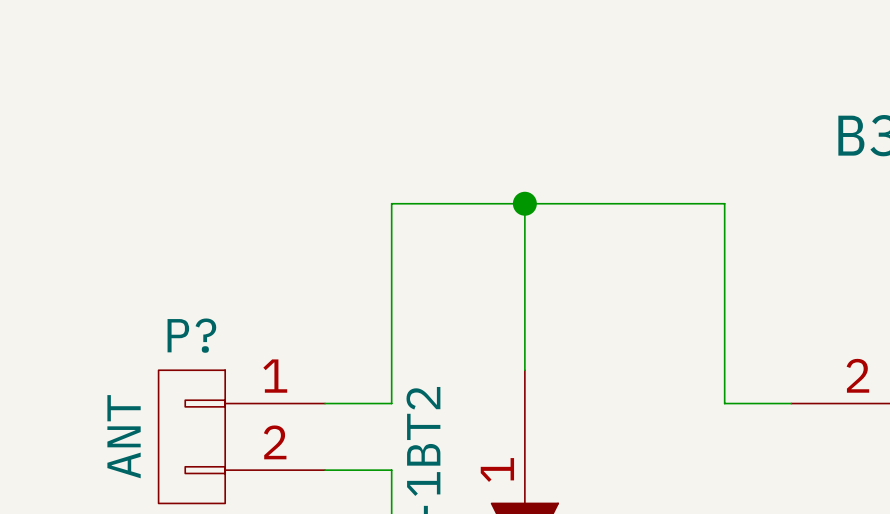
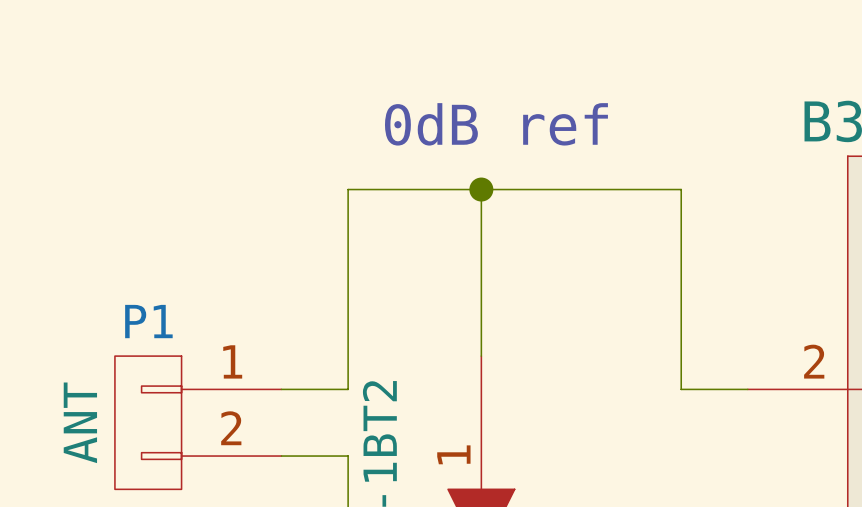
text: none -> 0dB ref (496, 124)
P? name: P? (191, 335) -> P1 (148, 321)

